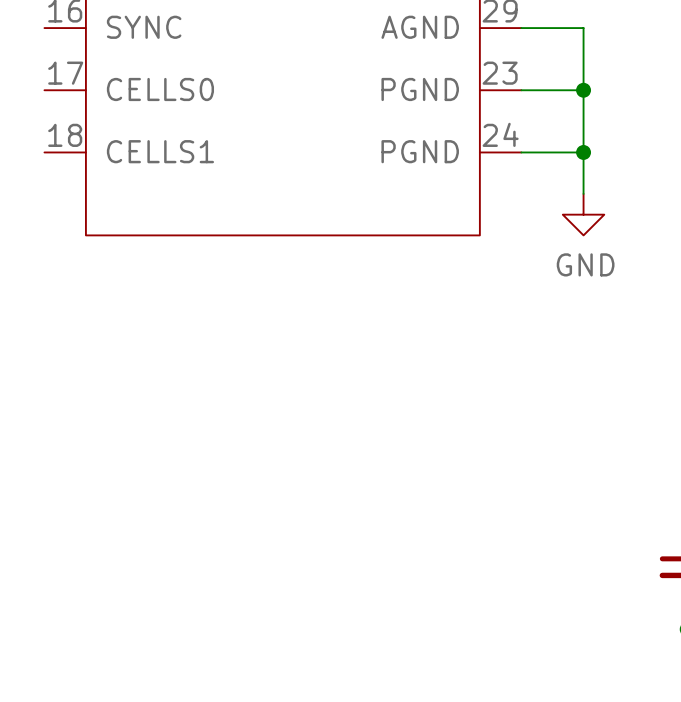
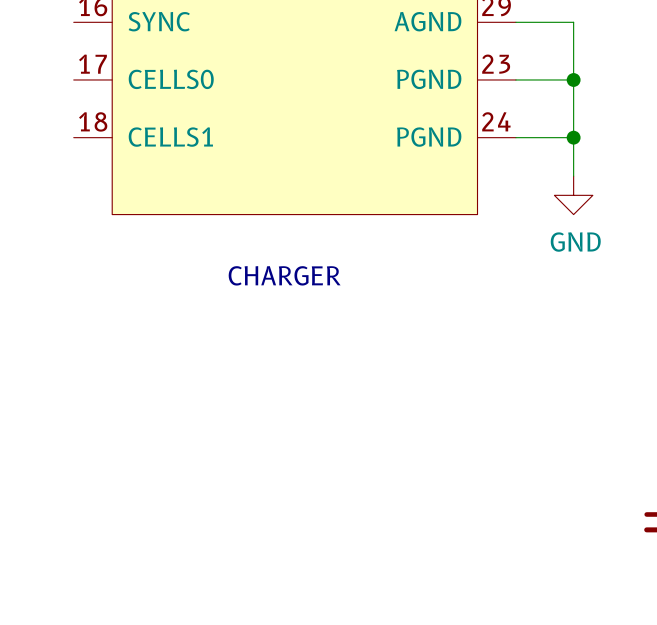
text: none -> CHARGER (284, 275)

